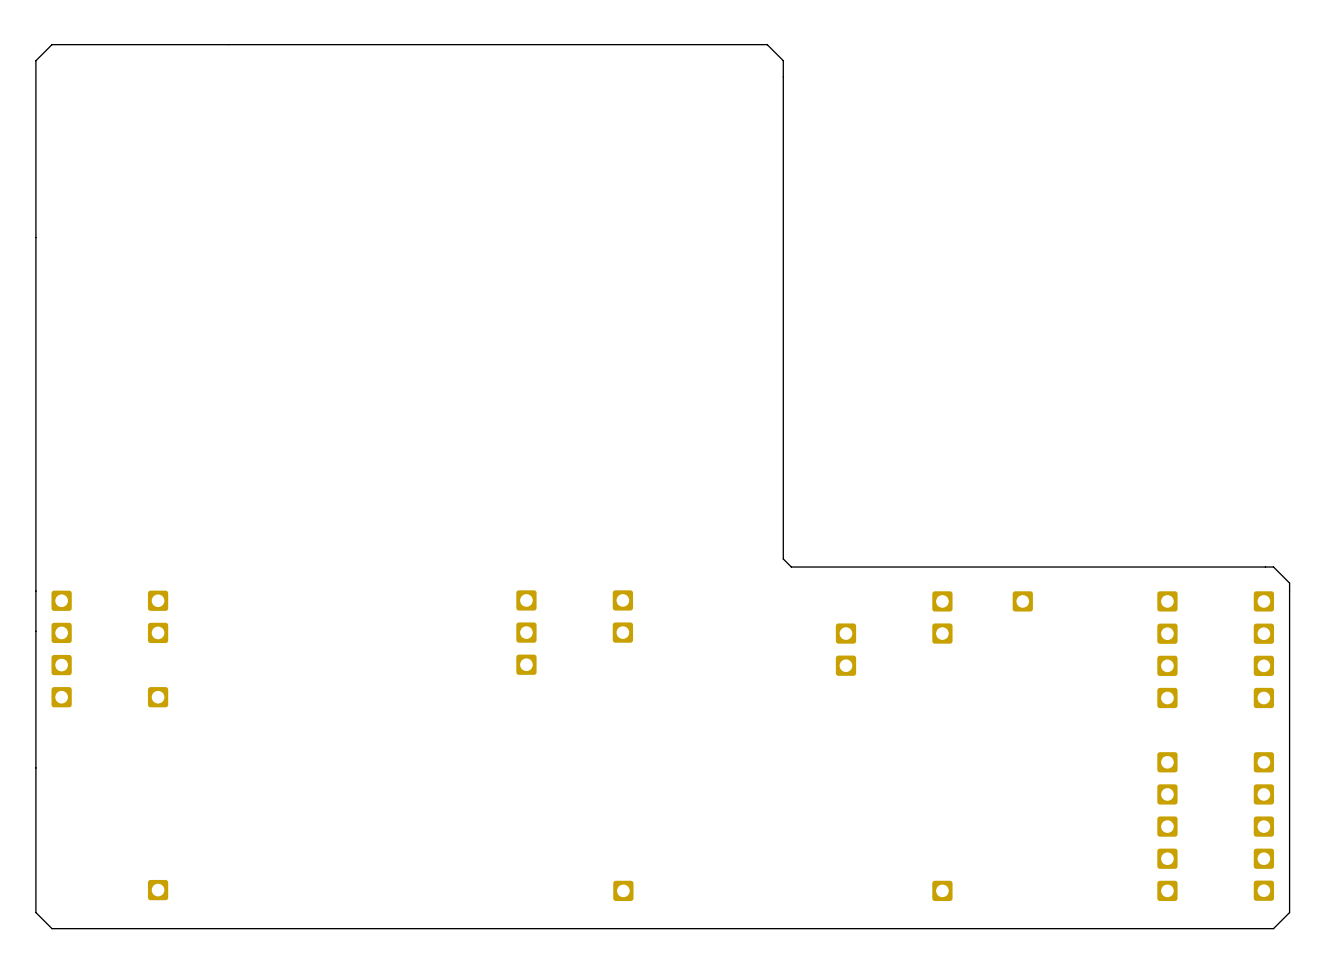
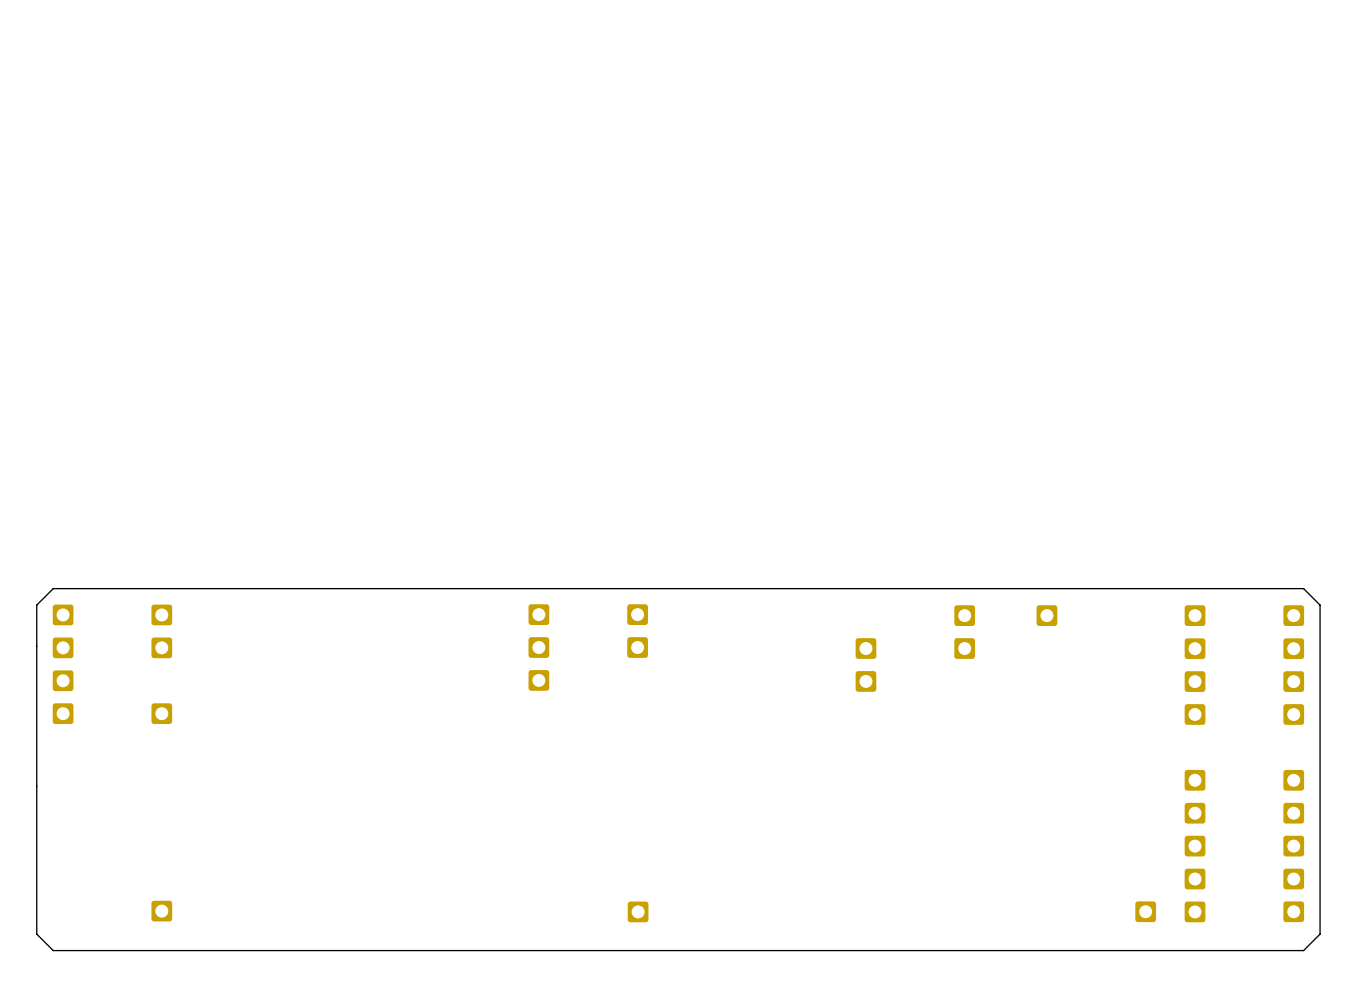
board edge: (1289, 591) (1289, 583) (1273, 567) (791, 567) (783, 558) (783, 60) (767, 44) (51, 44) (35, 60) (35, 591) -> (1320, 605) (1303, 588) (53, 588) (36, 605)
part position: (942, 890) -> (1145, 911)

